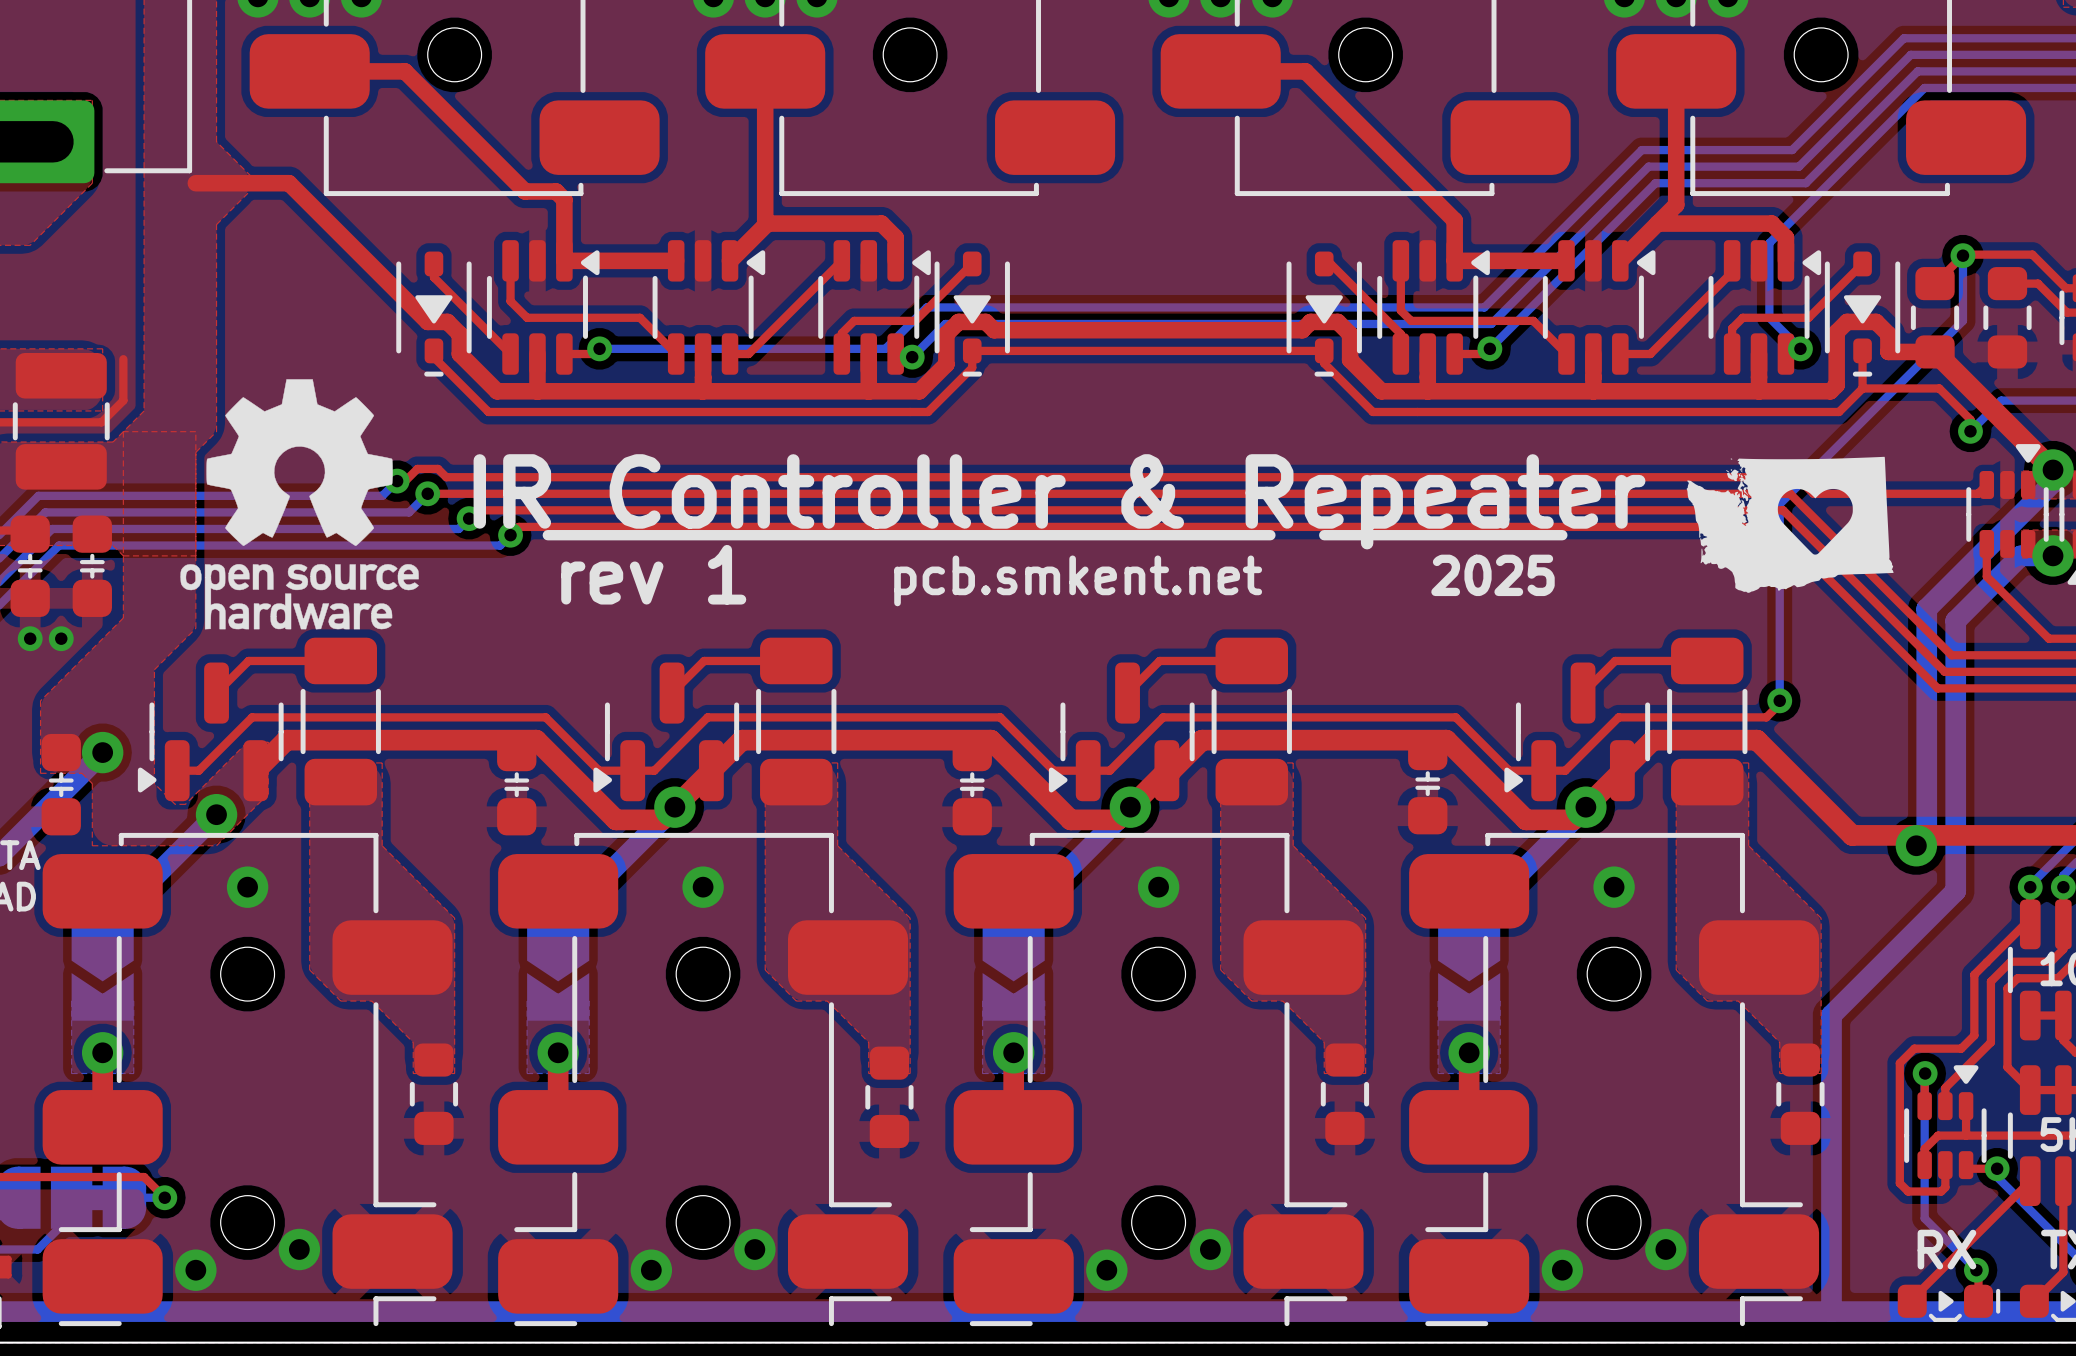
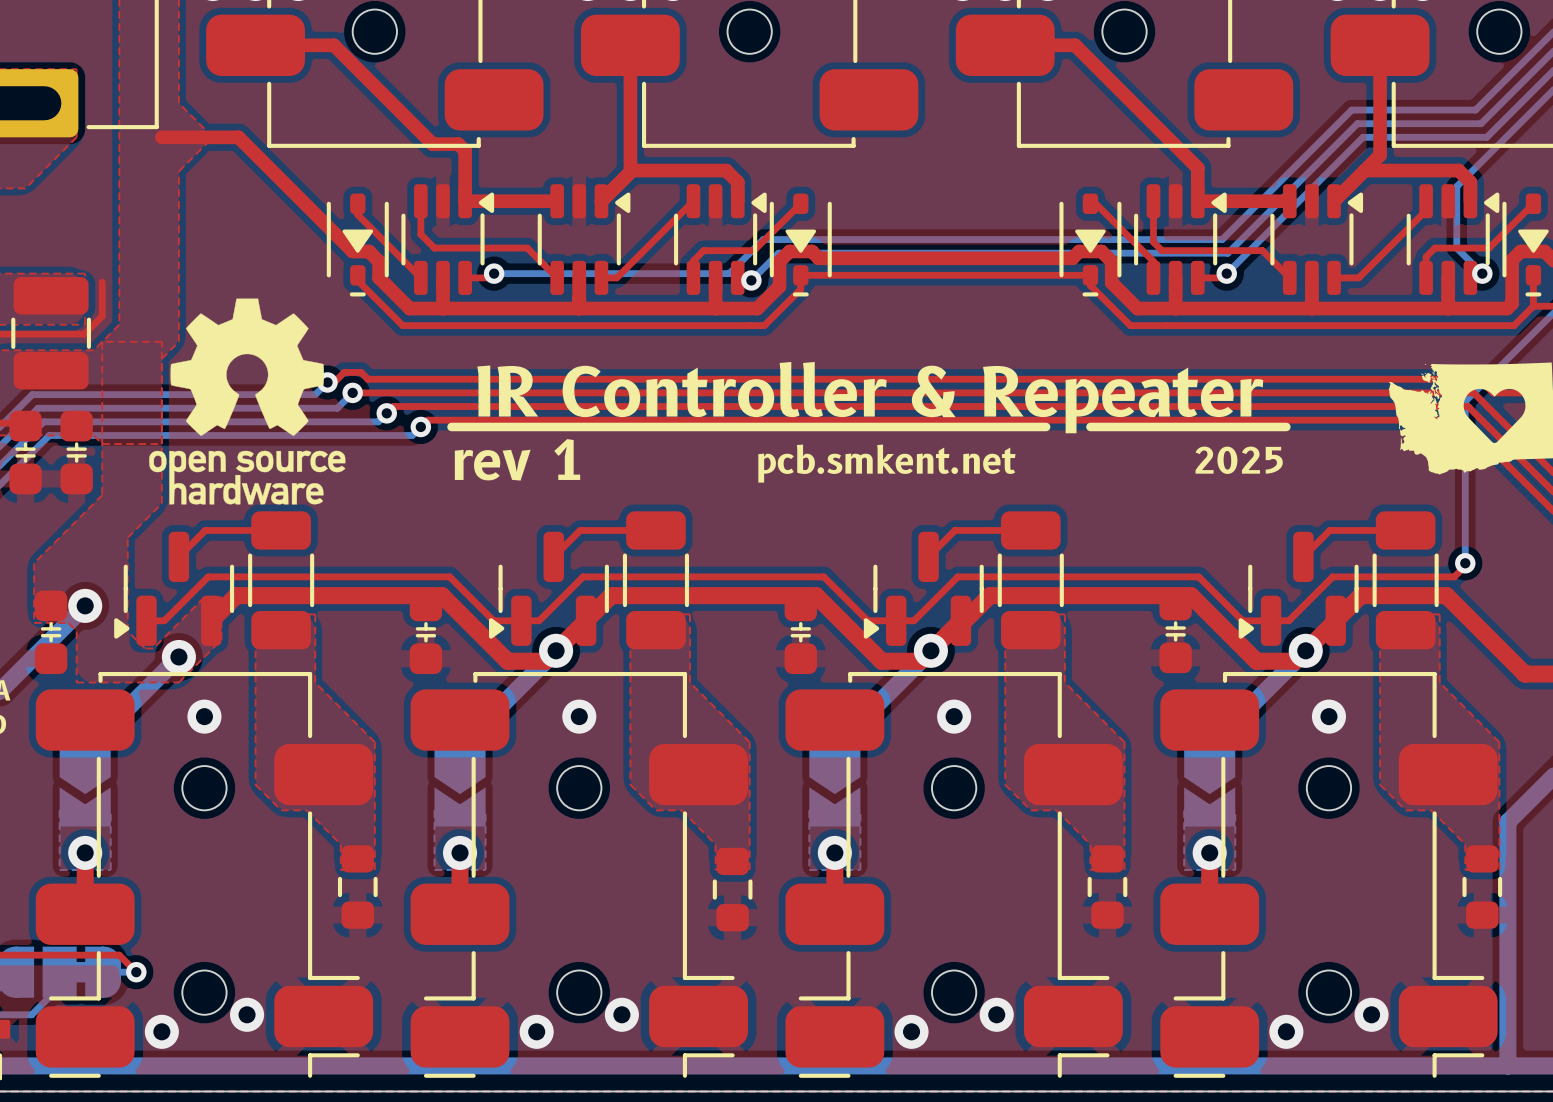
via: (30, 638) -> none
via: (61, 638) -> none

